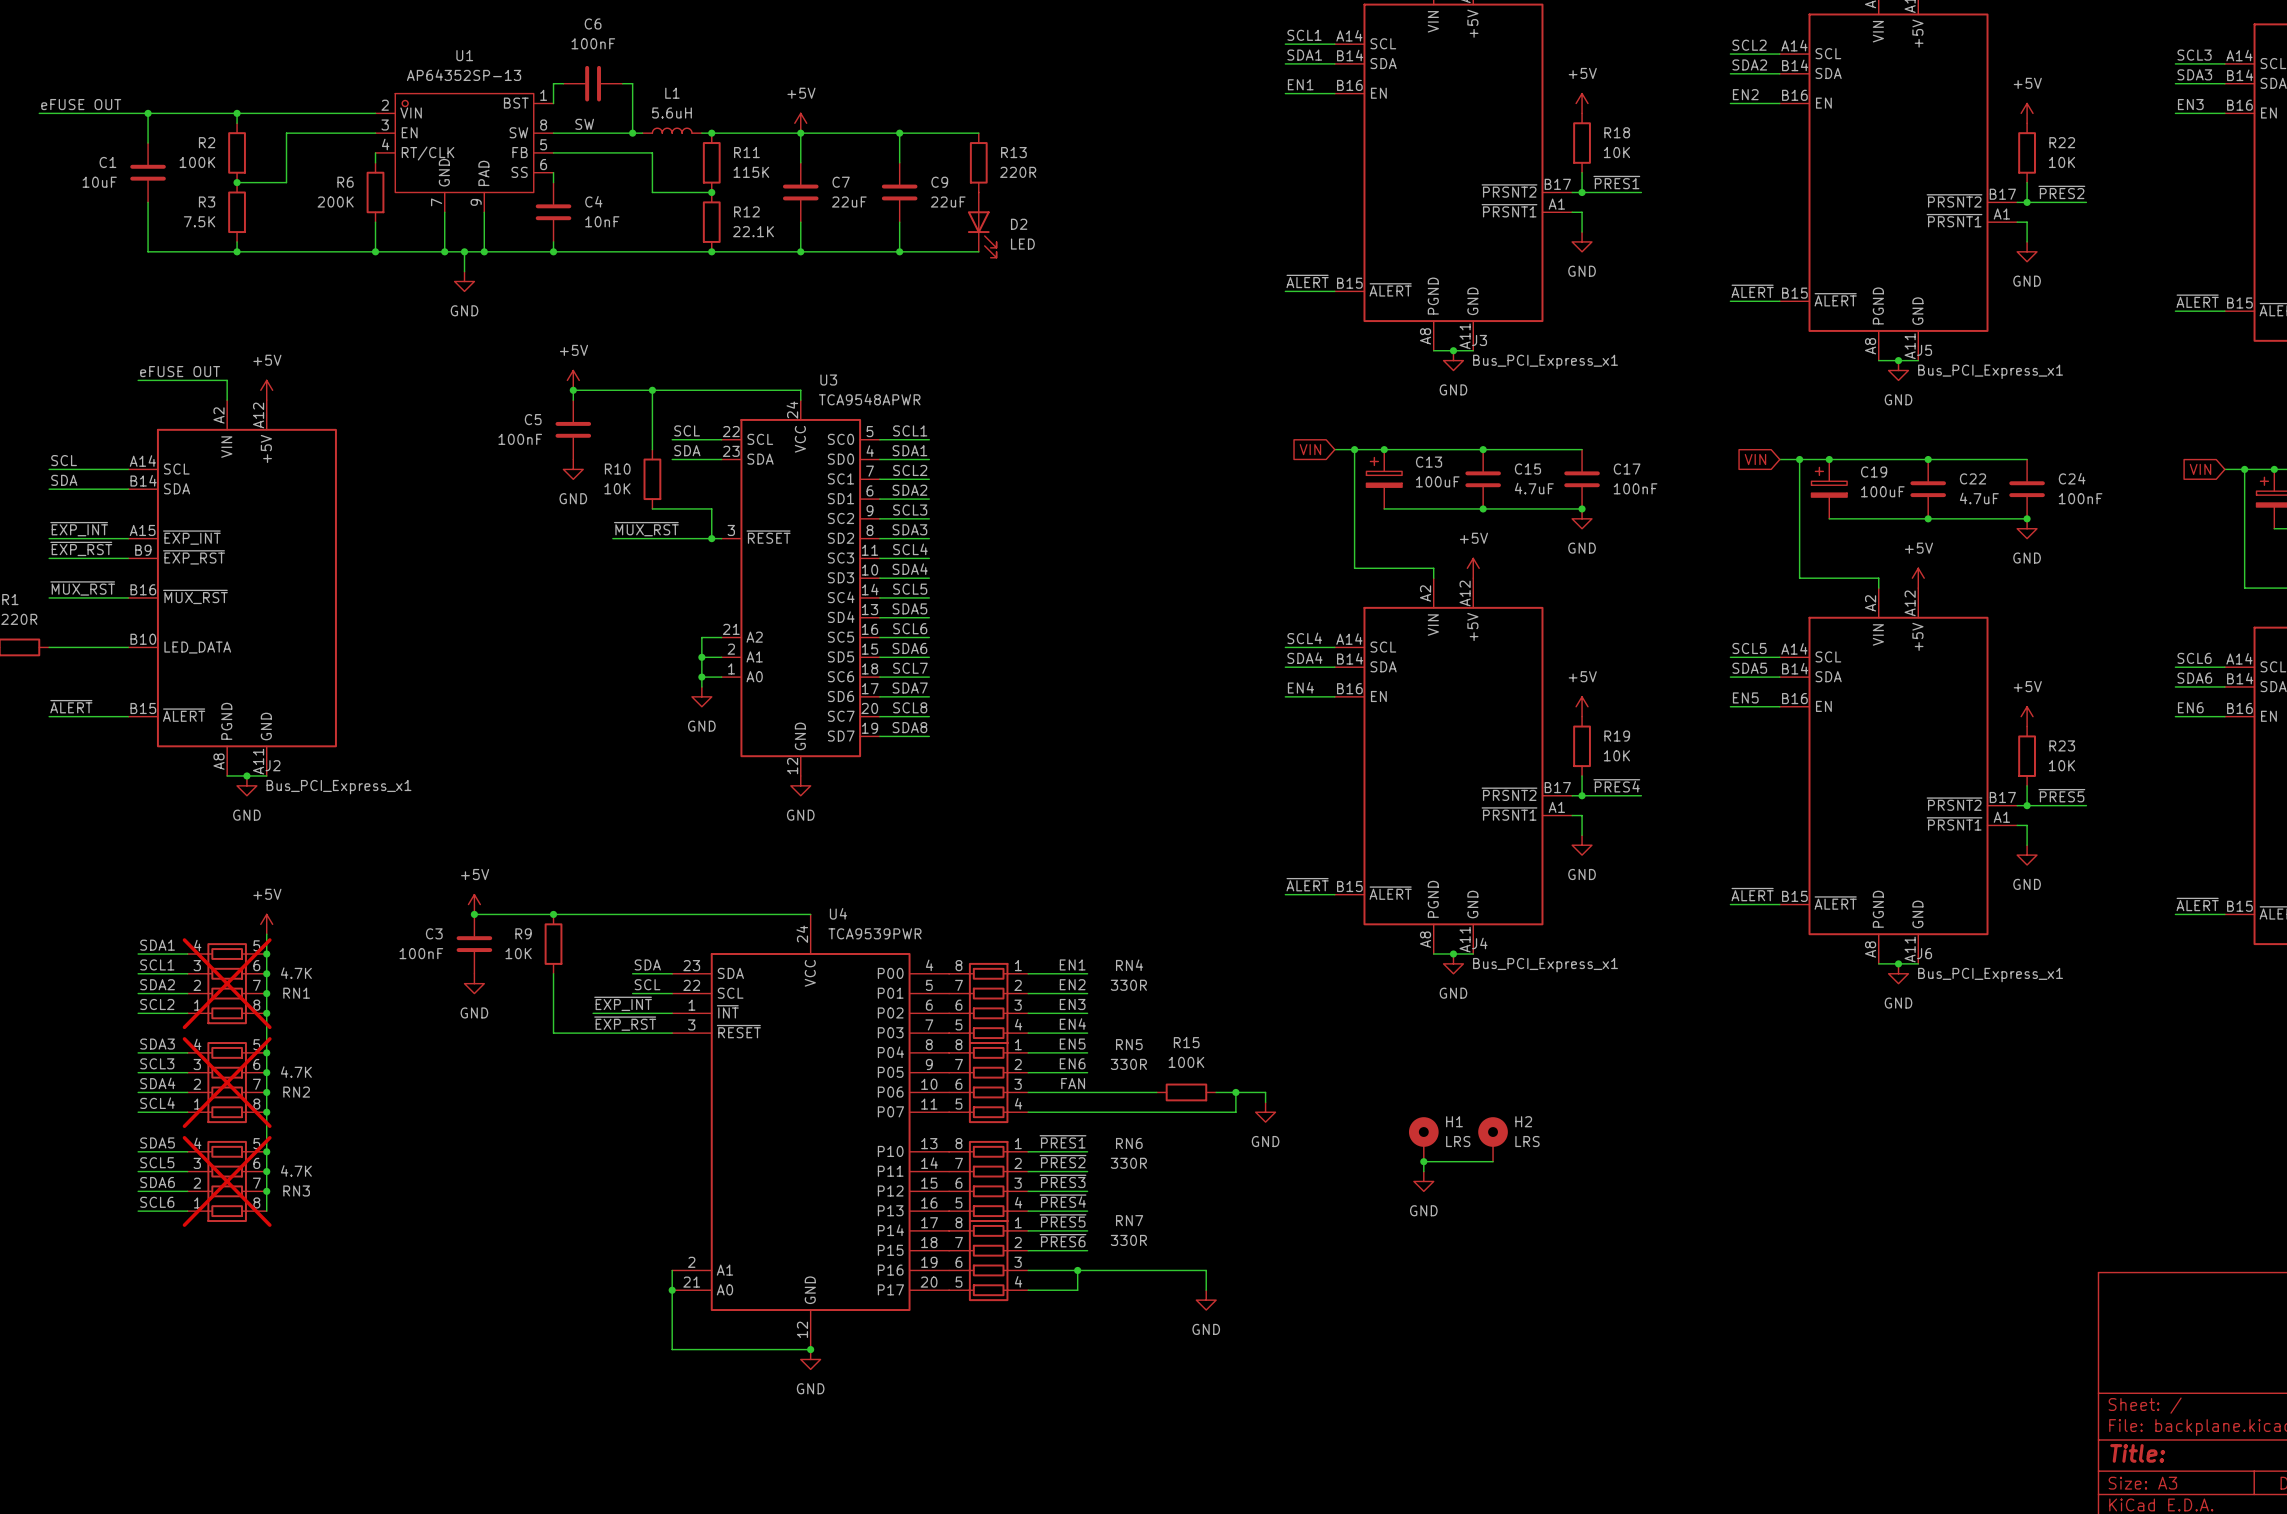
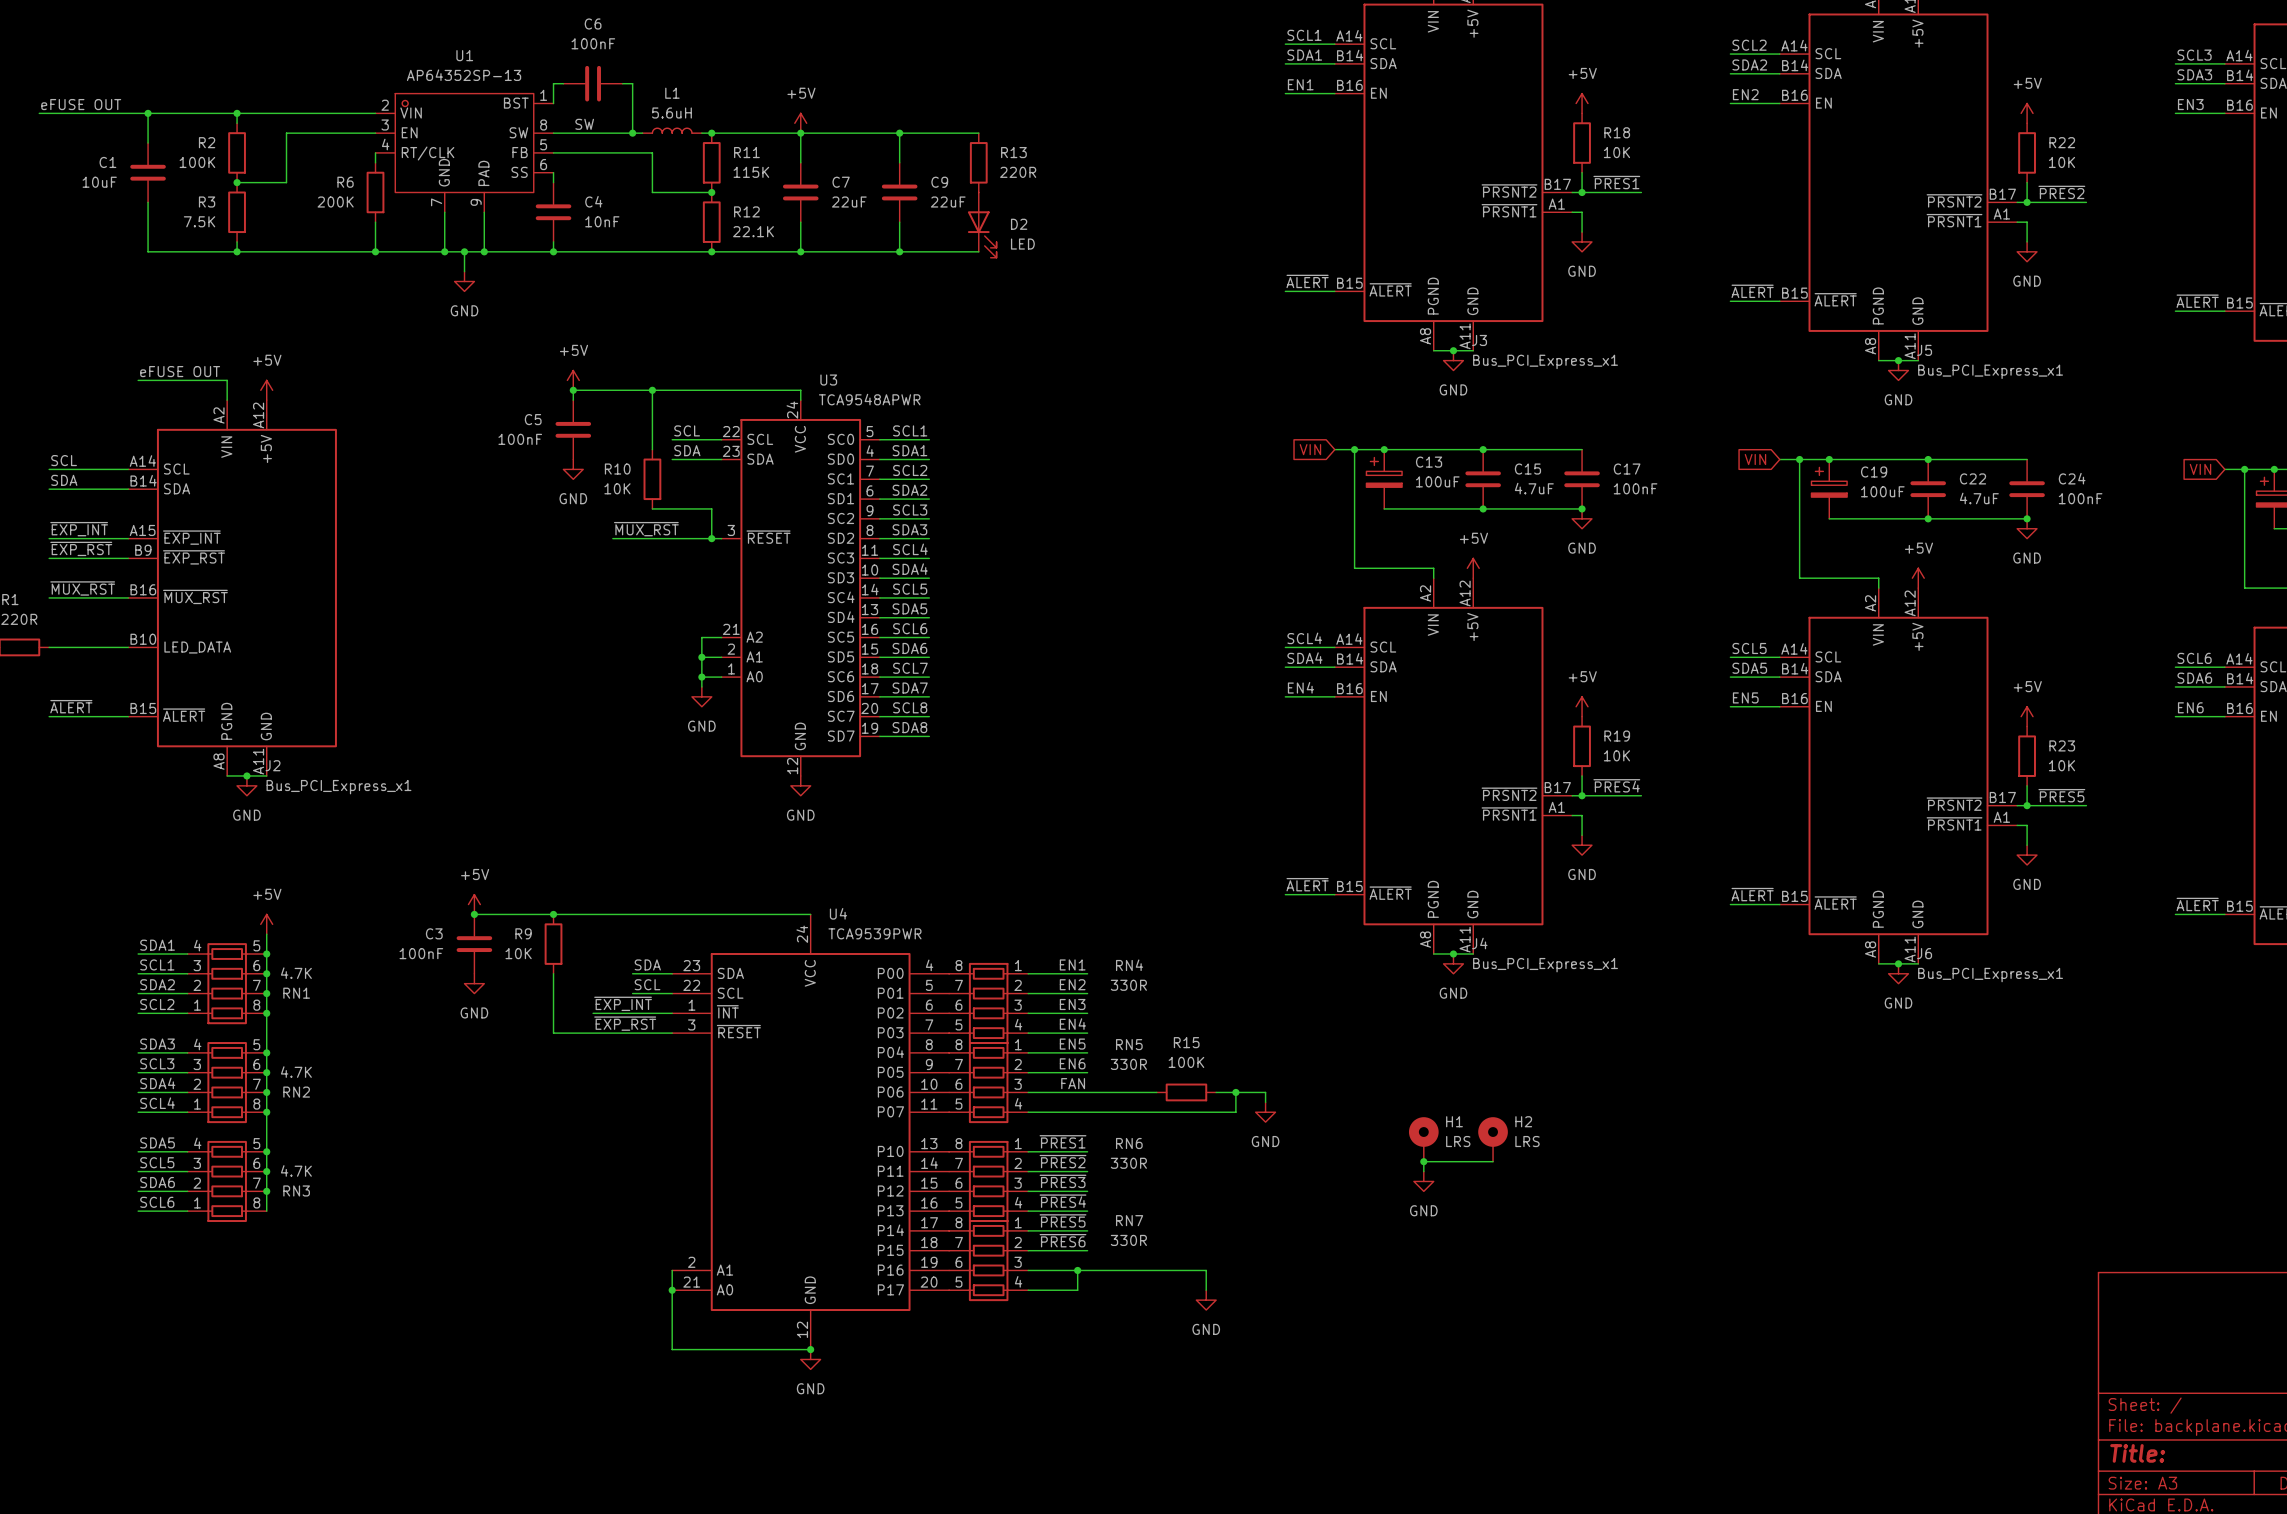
RN1 do-not-place cross: (227, 983) -> none
RN2 do-not-place cross: (227, 1082) -> none
RN3 do-not-place cross: (227, 1181) -> none

